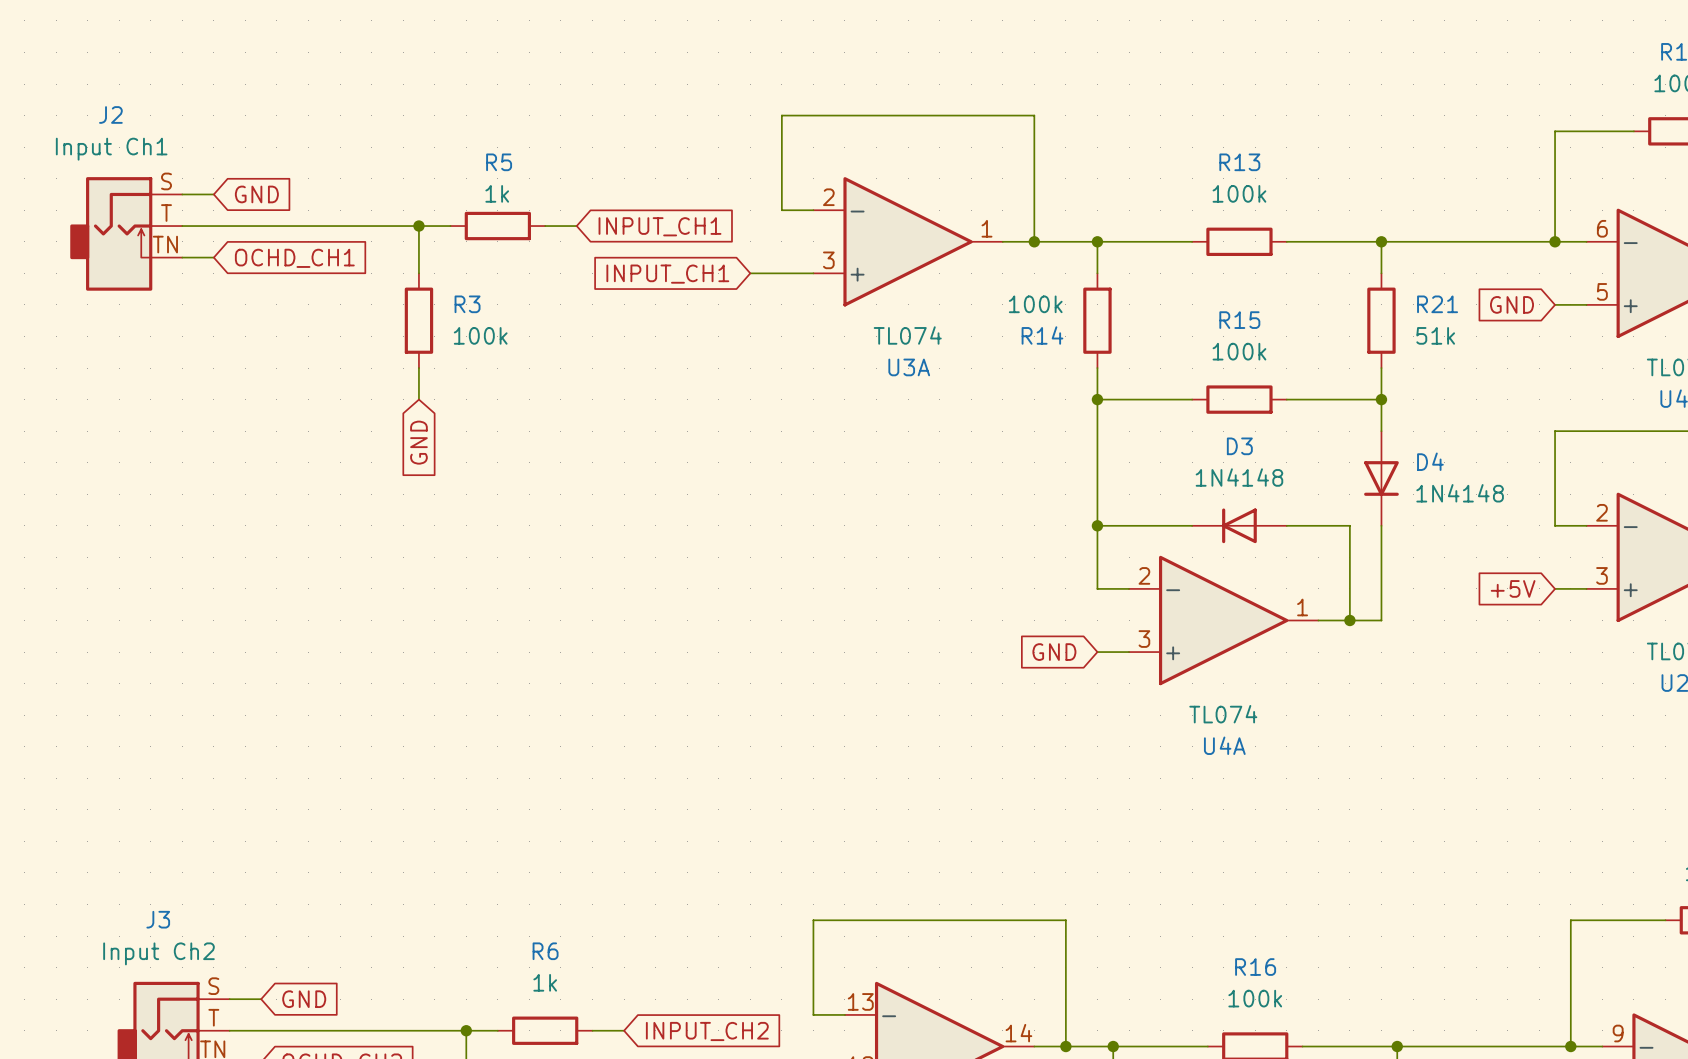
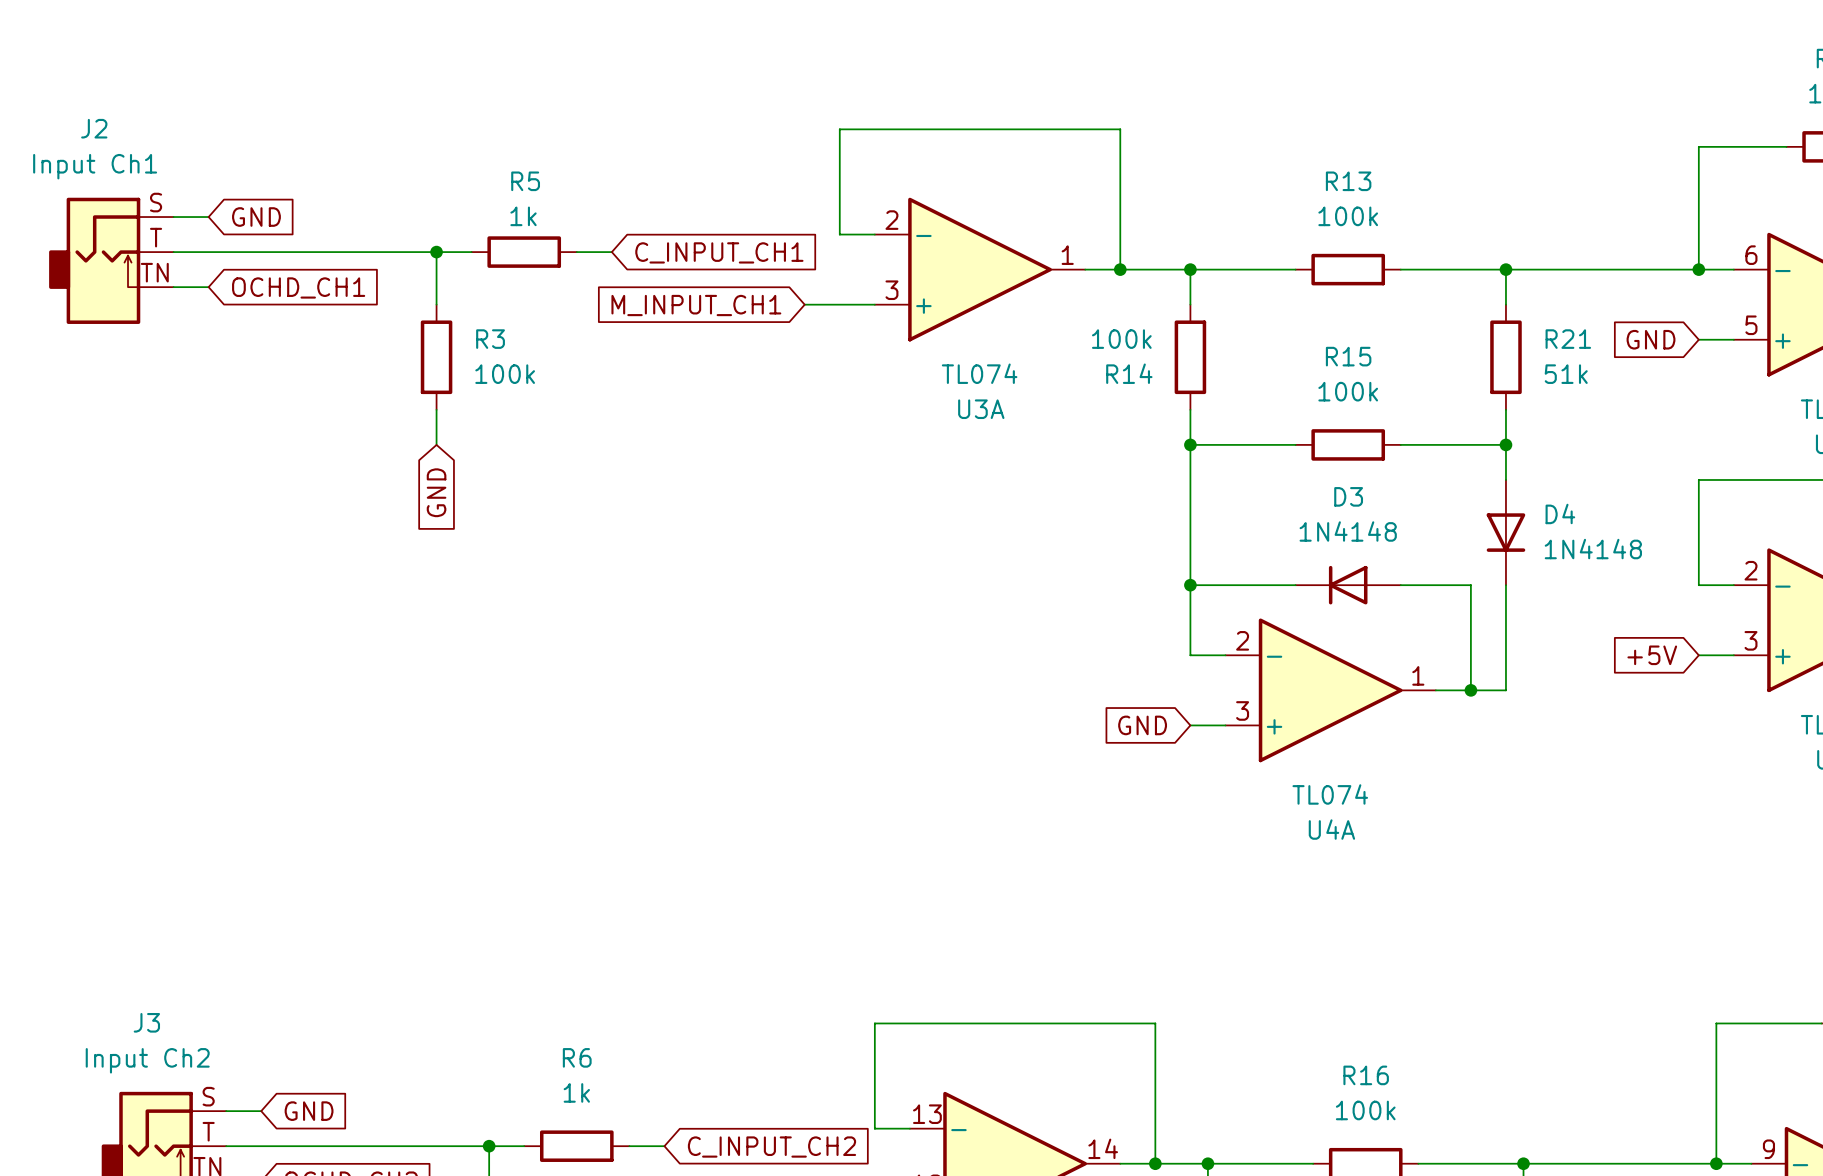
global label: INPUT_CH1 (659, 226) -> С_INPUT_CH1 (719, 252)
global label: INPUT_CH1 (667, 274) -> M_INPUT_CH1 (696, 305)
global label: INPUT_CH2 (707, 1031) -> С_INPUT_CH2 (771, 1147)

